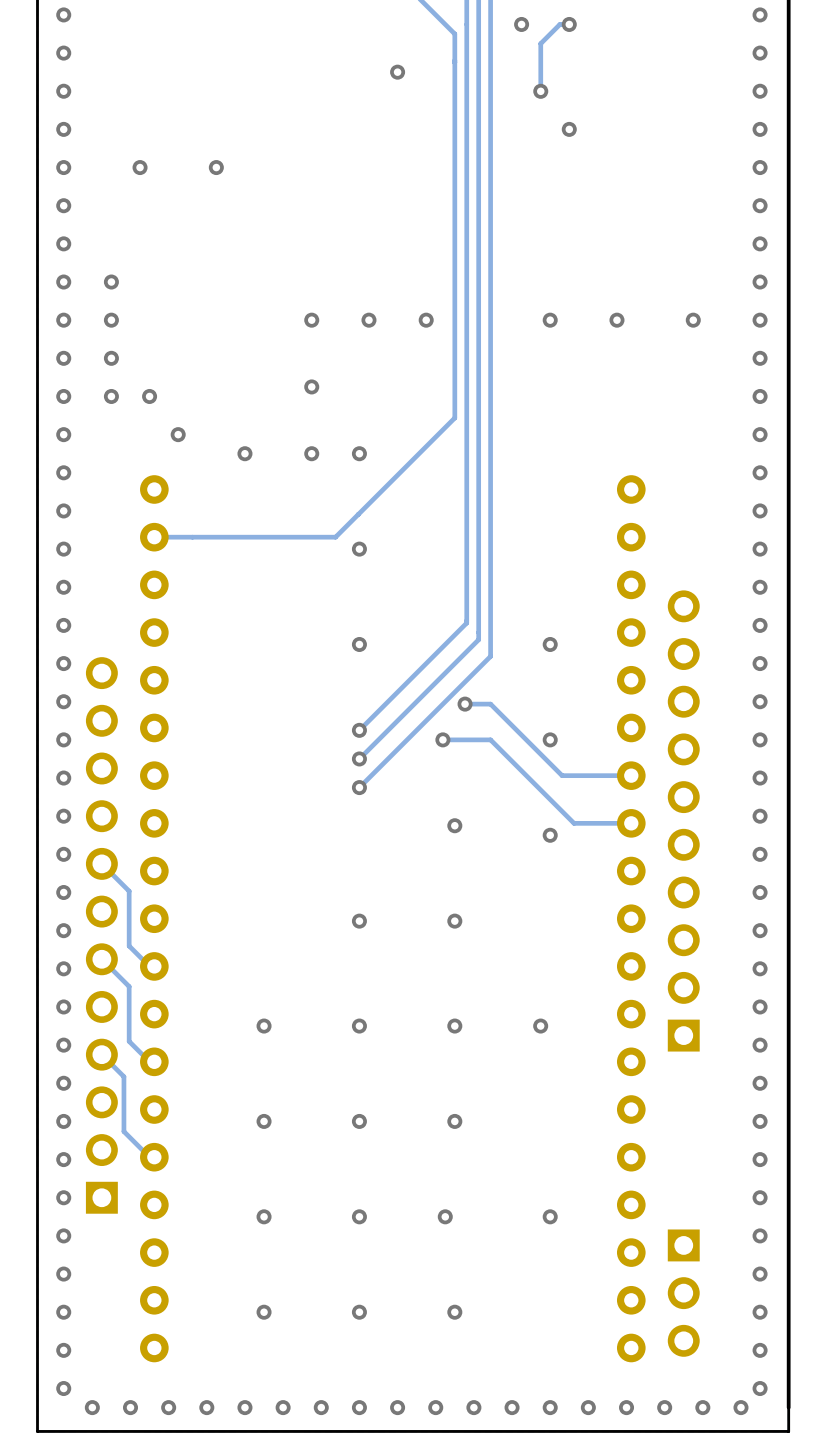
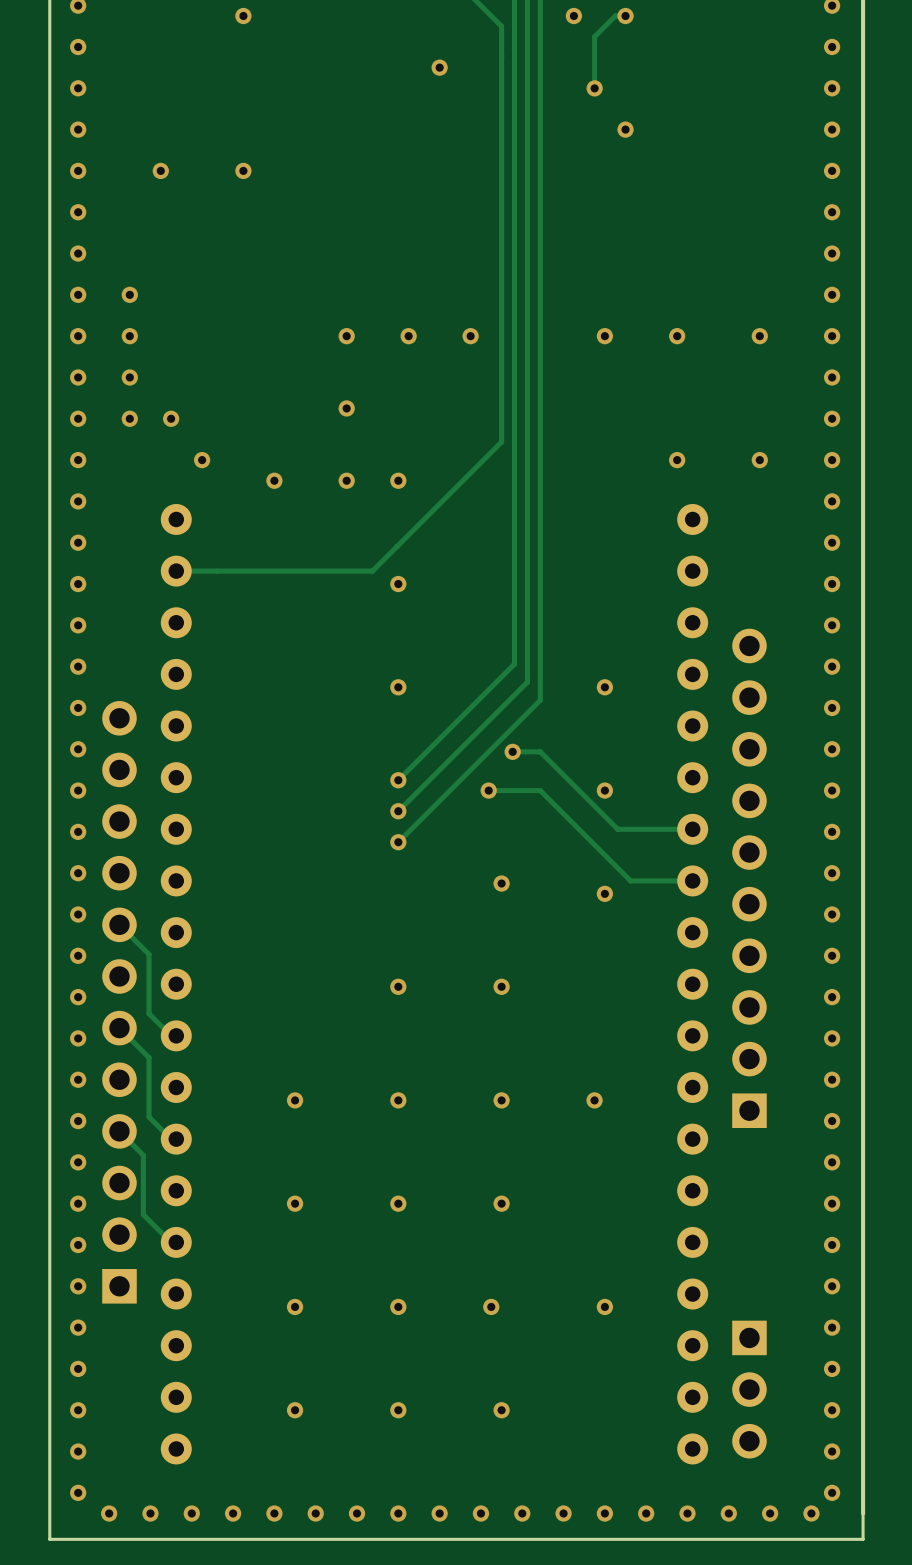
via: none -> (243, 16)
via: none -> (677, 460)
via: none -> (759, 460)

